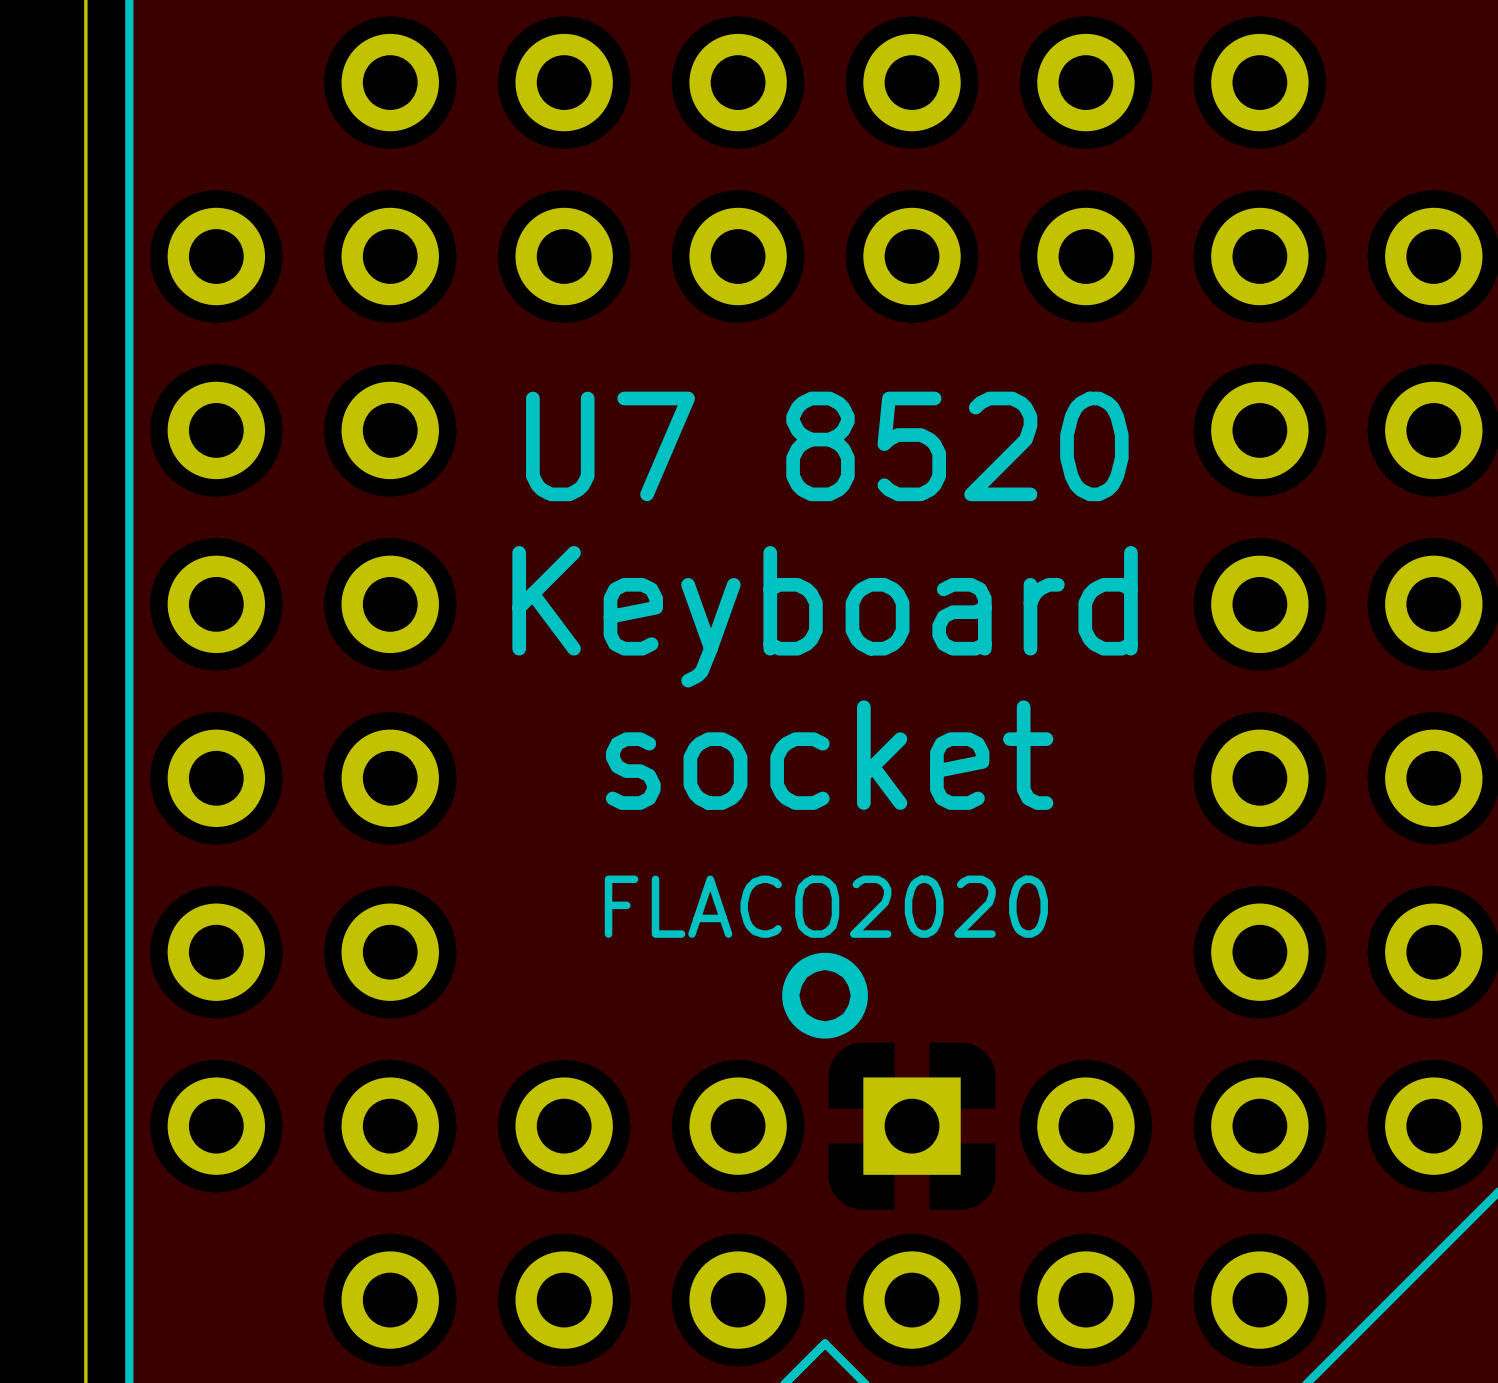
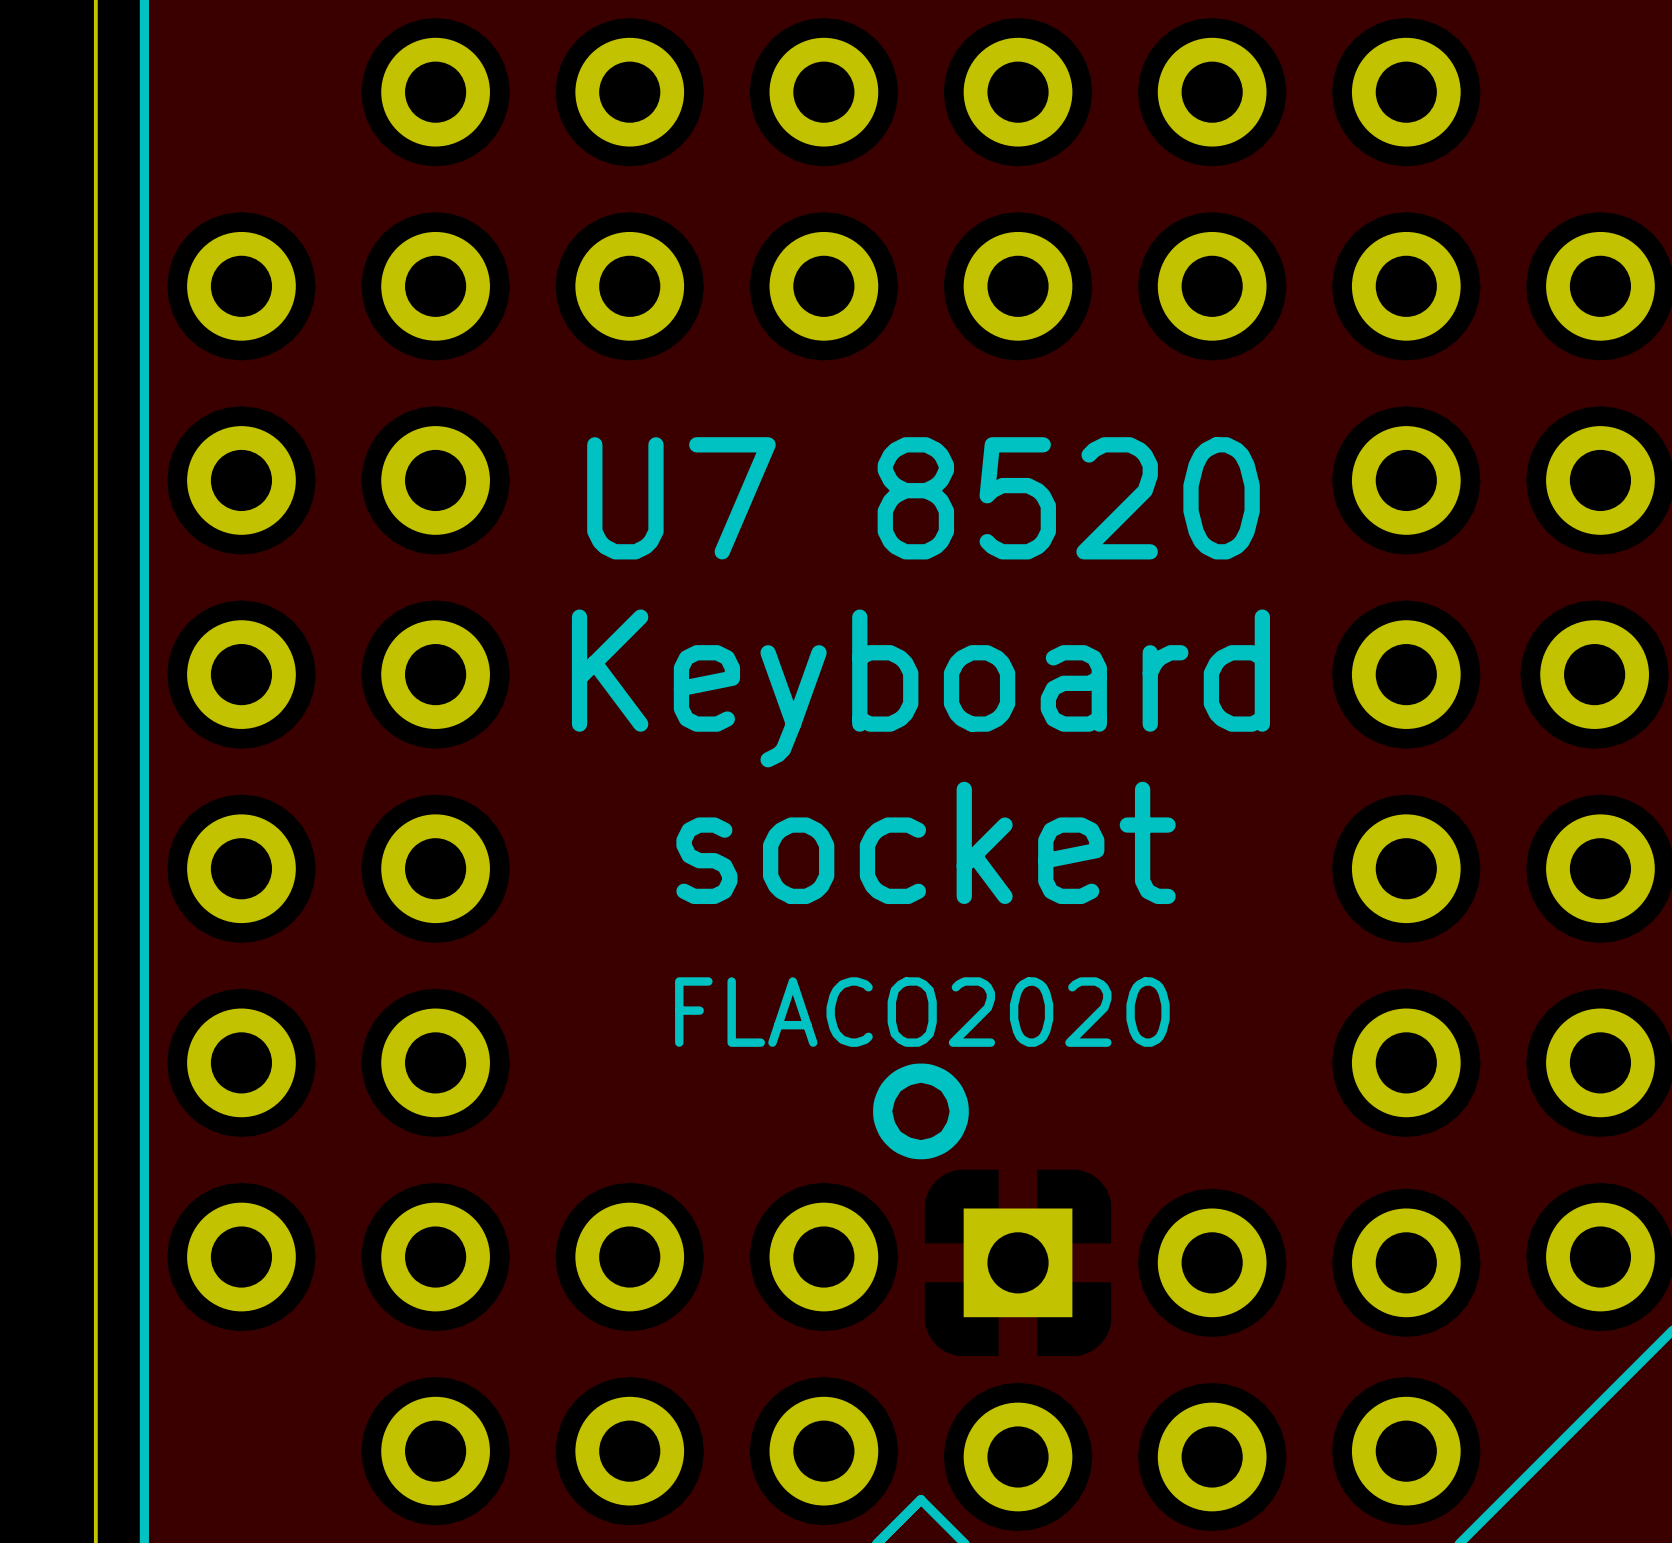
part footprint: [167, 33, 1483, 1349] -> [187, 37, 1655, 1512]

